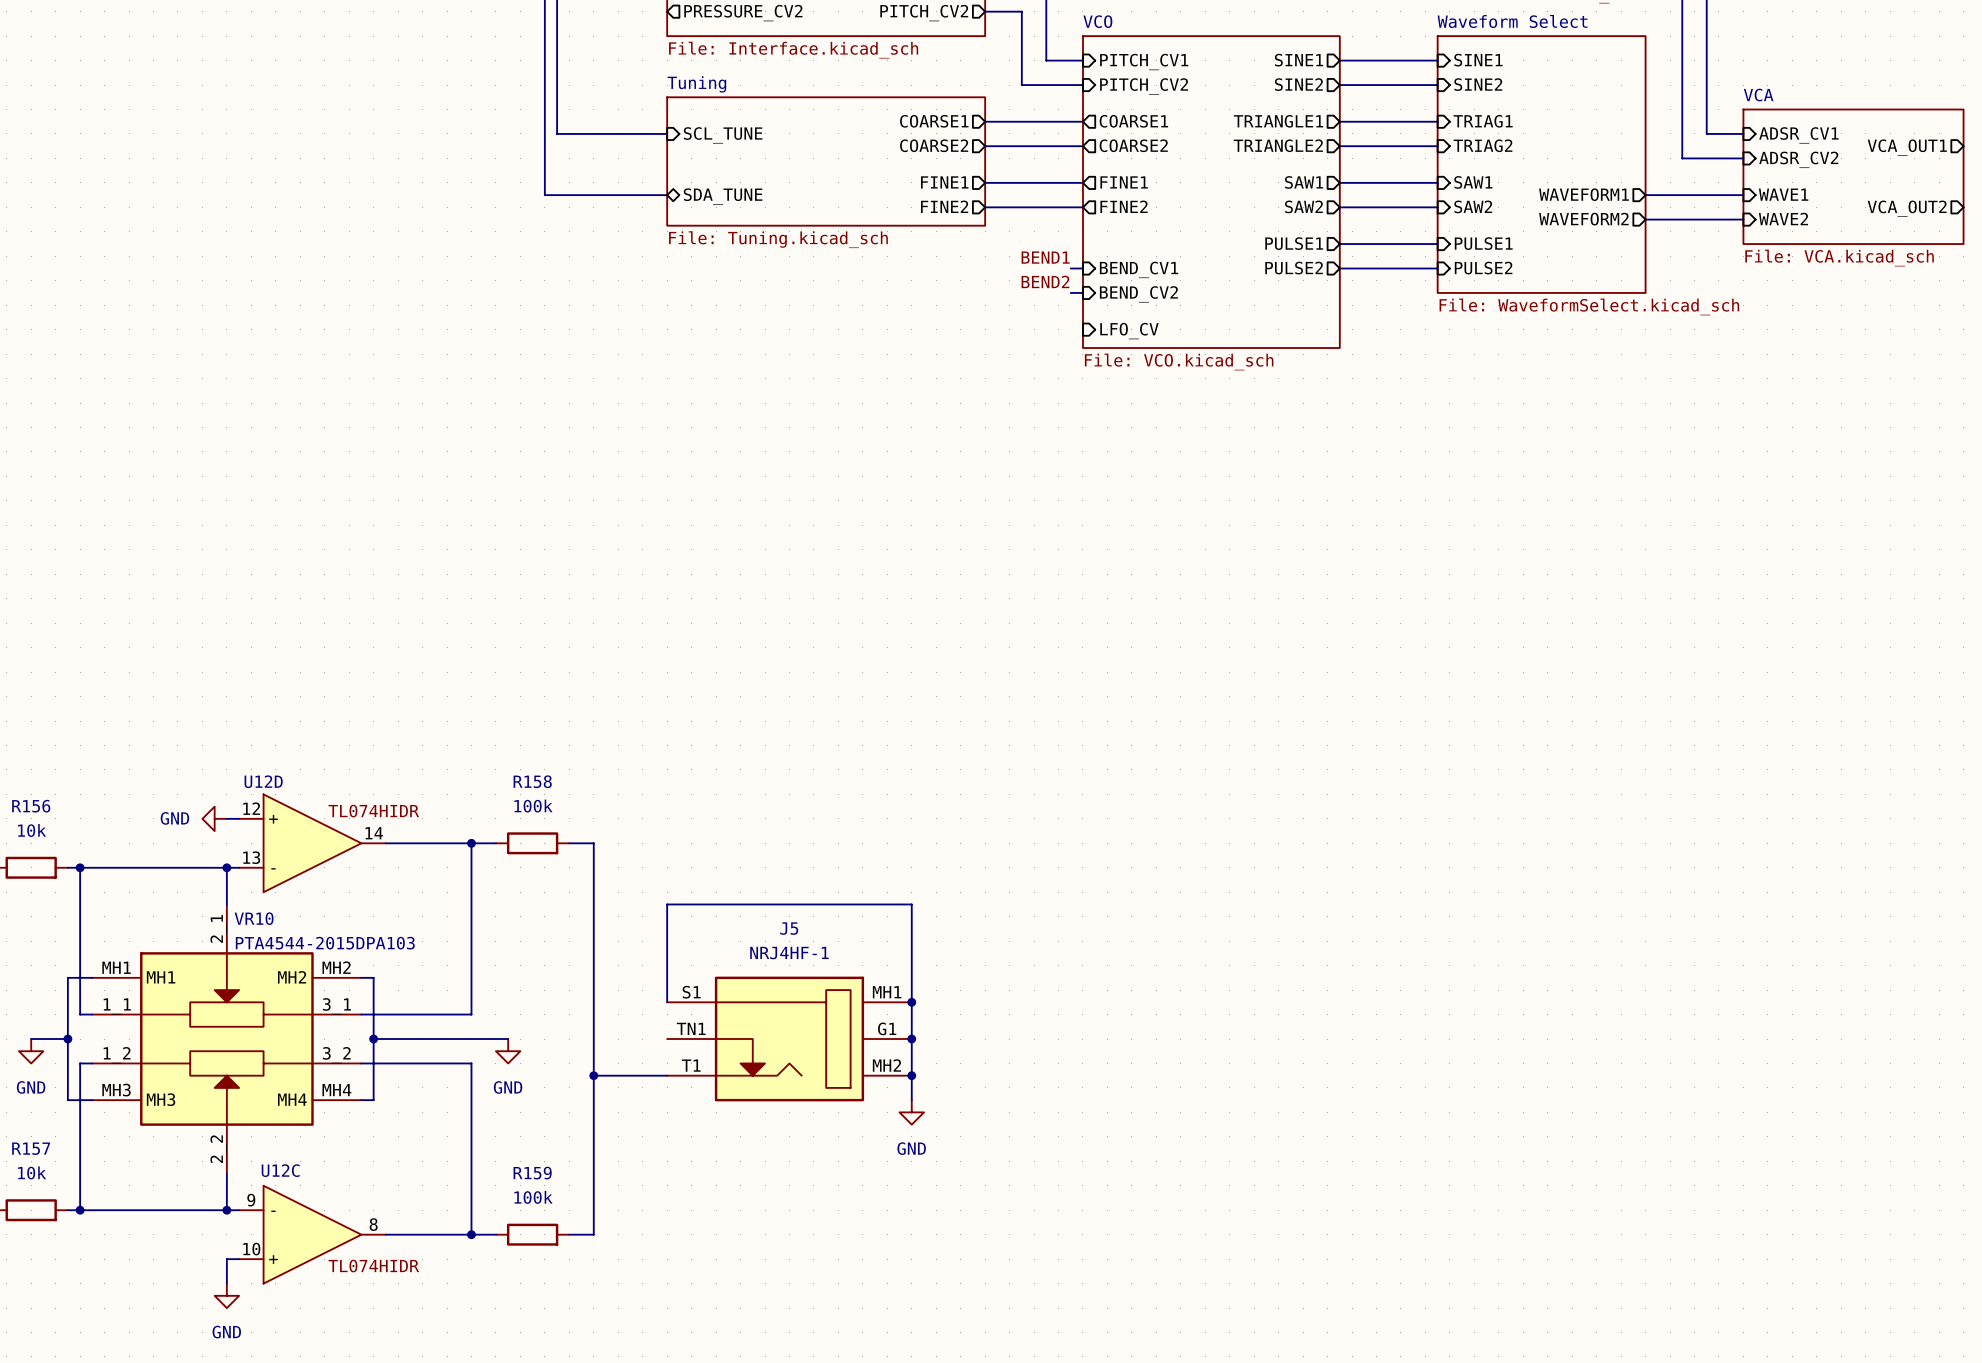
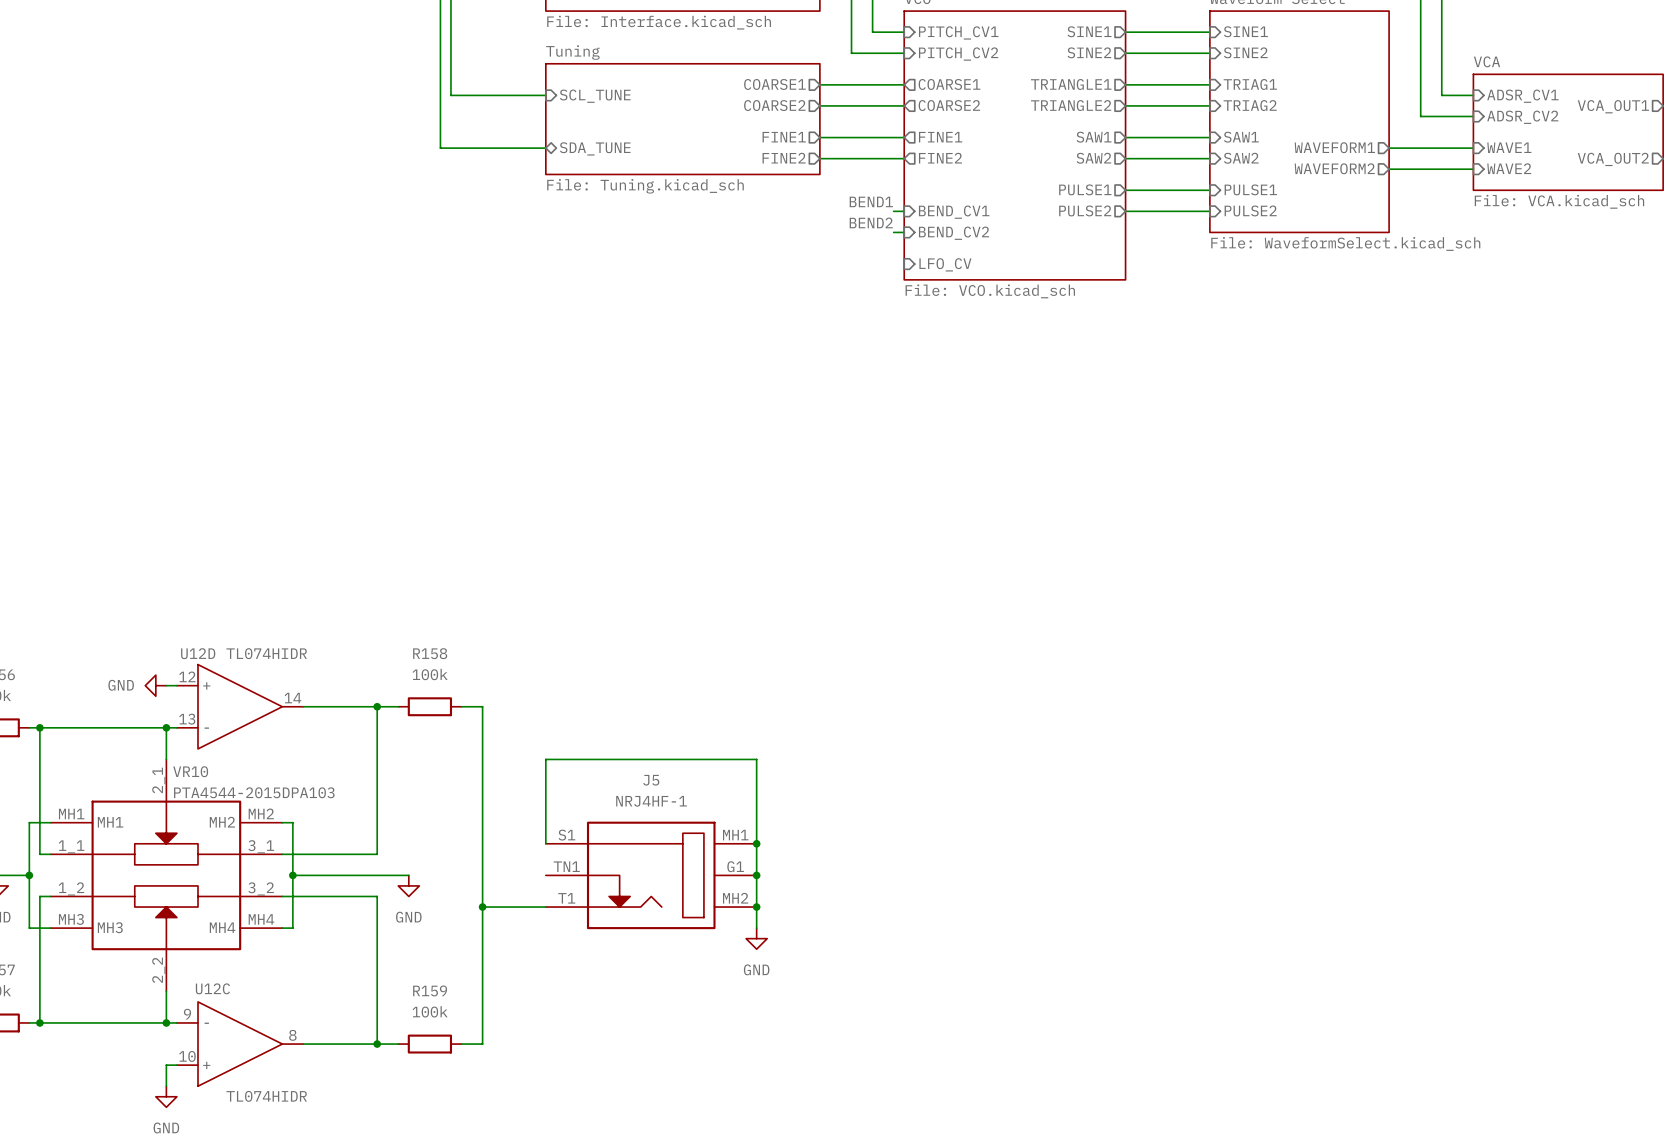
U12D value: none -> TL074HIDR (266, 653)
U12D text: TL074HIDR (373, 811) -> none
U12C text: TL074HIDR (373, 1266) -> none
U12C value: none -> TL074HIDR (266, 1096)

